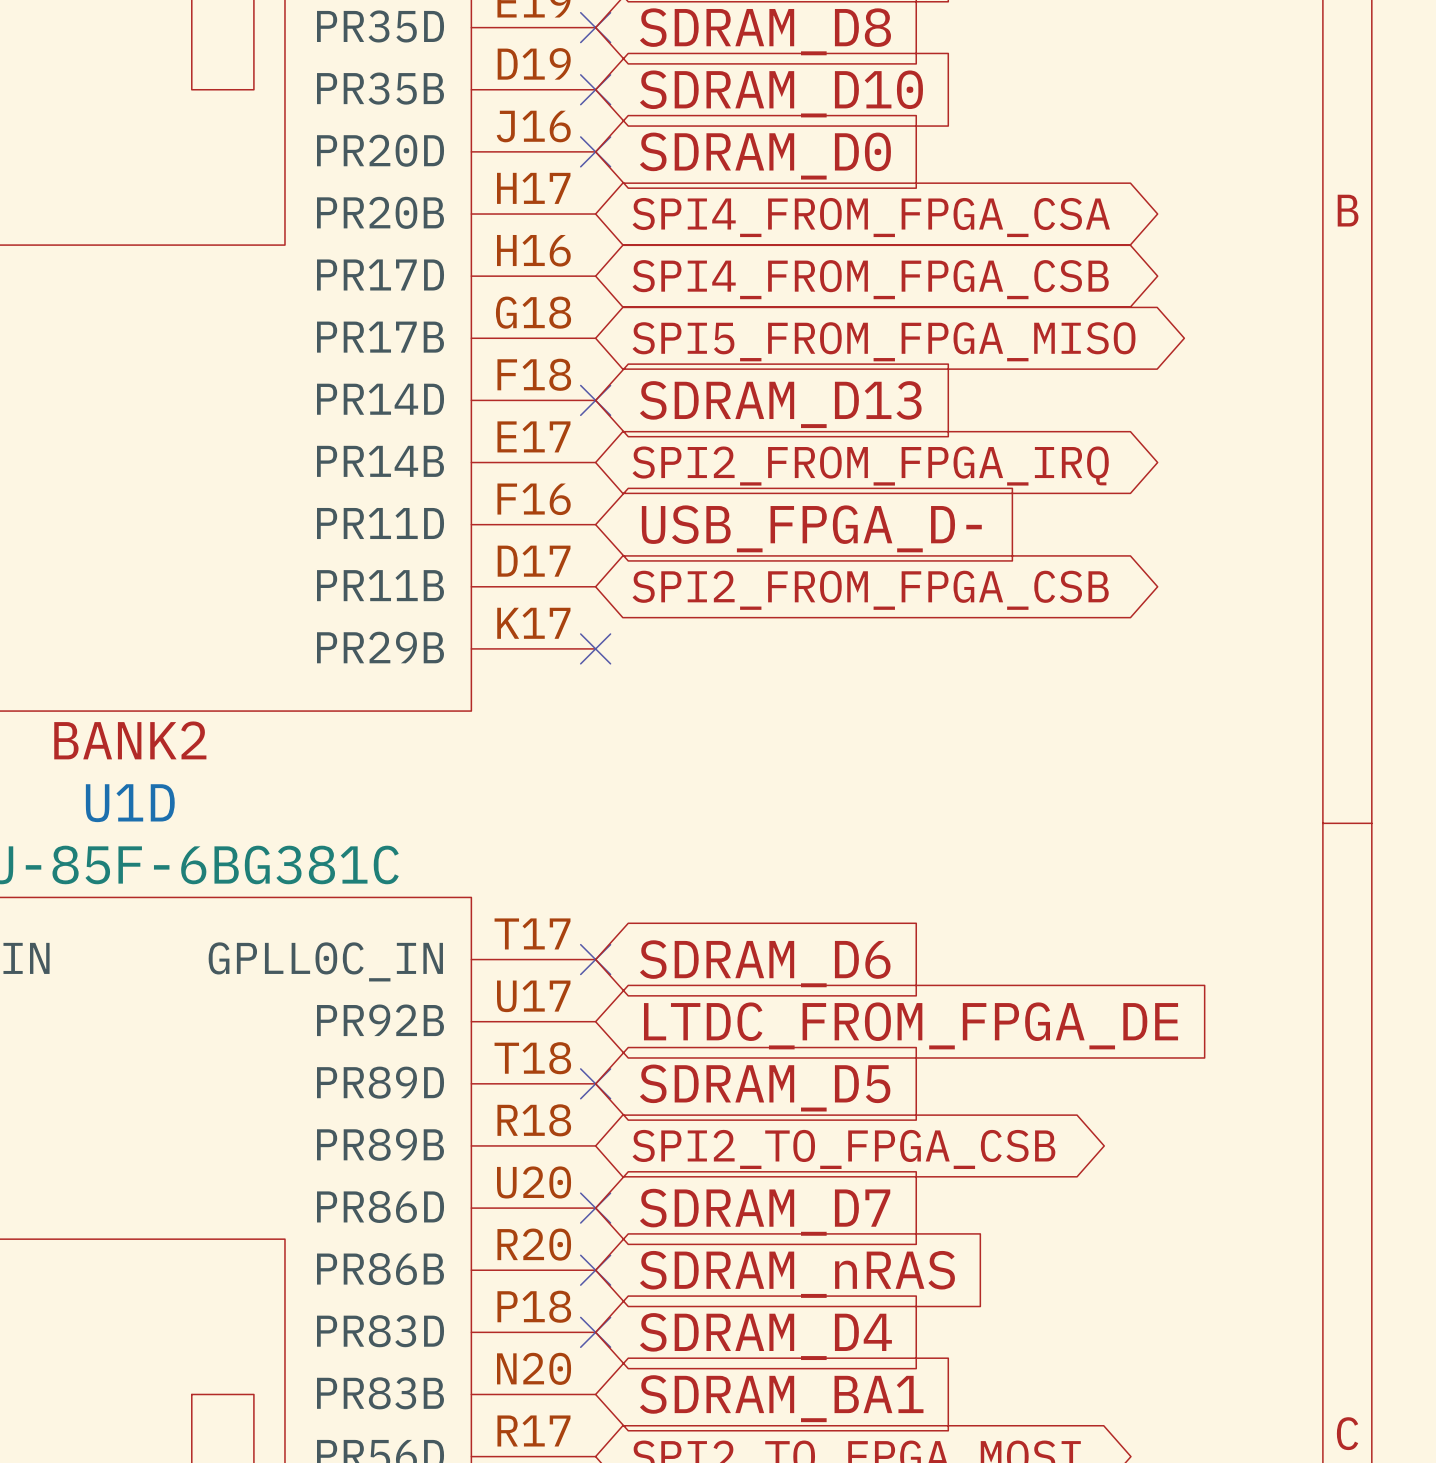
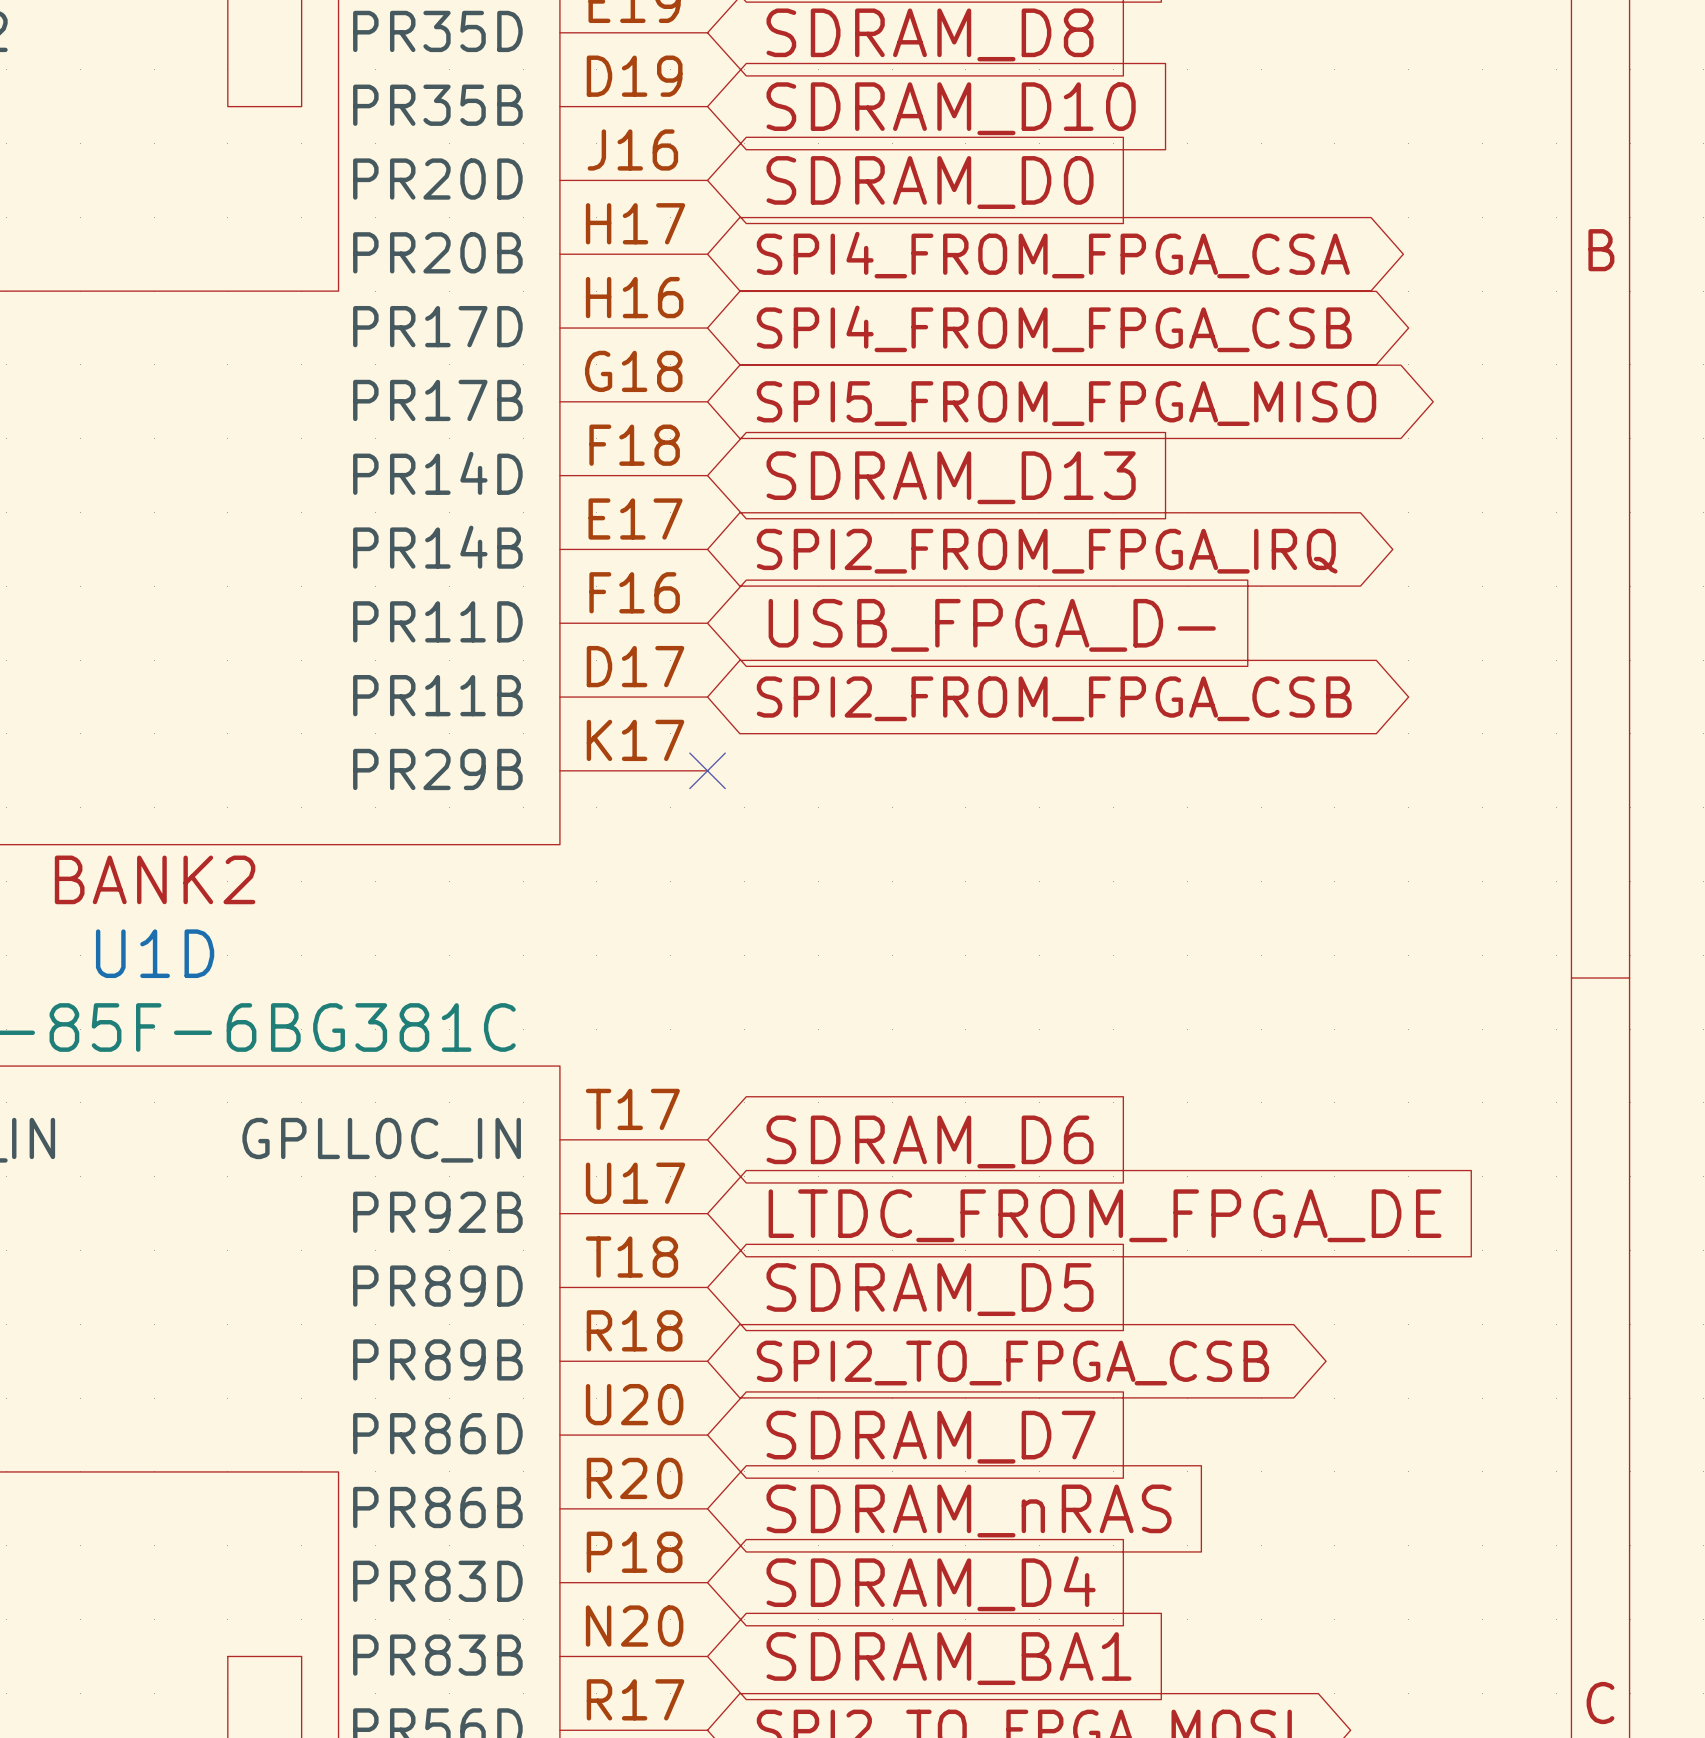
no-connect mark: (595, 27) -> none
no-connect mark: (595, 89) -> none
no-connect mark: (595, 151) -> none
no-connect mark: (595, 400) -> none
no-connect mark: (595, 959) -> none
no-connect mark: (595, 1083) -> none
no-connect mark: (595, 1208) -> none
no-connect mark: (595, 1270) -> none
no-connect mark: (595, 1332) -> none

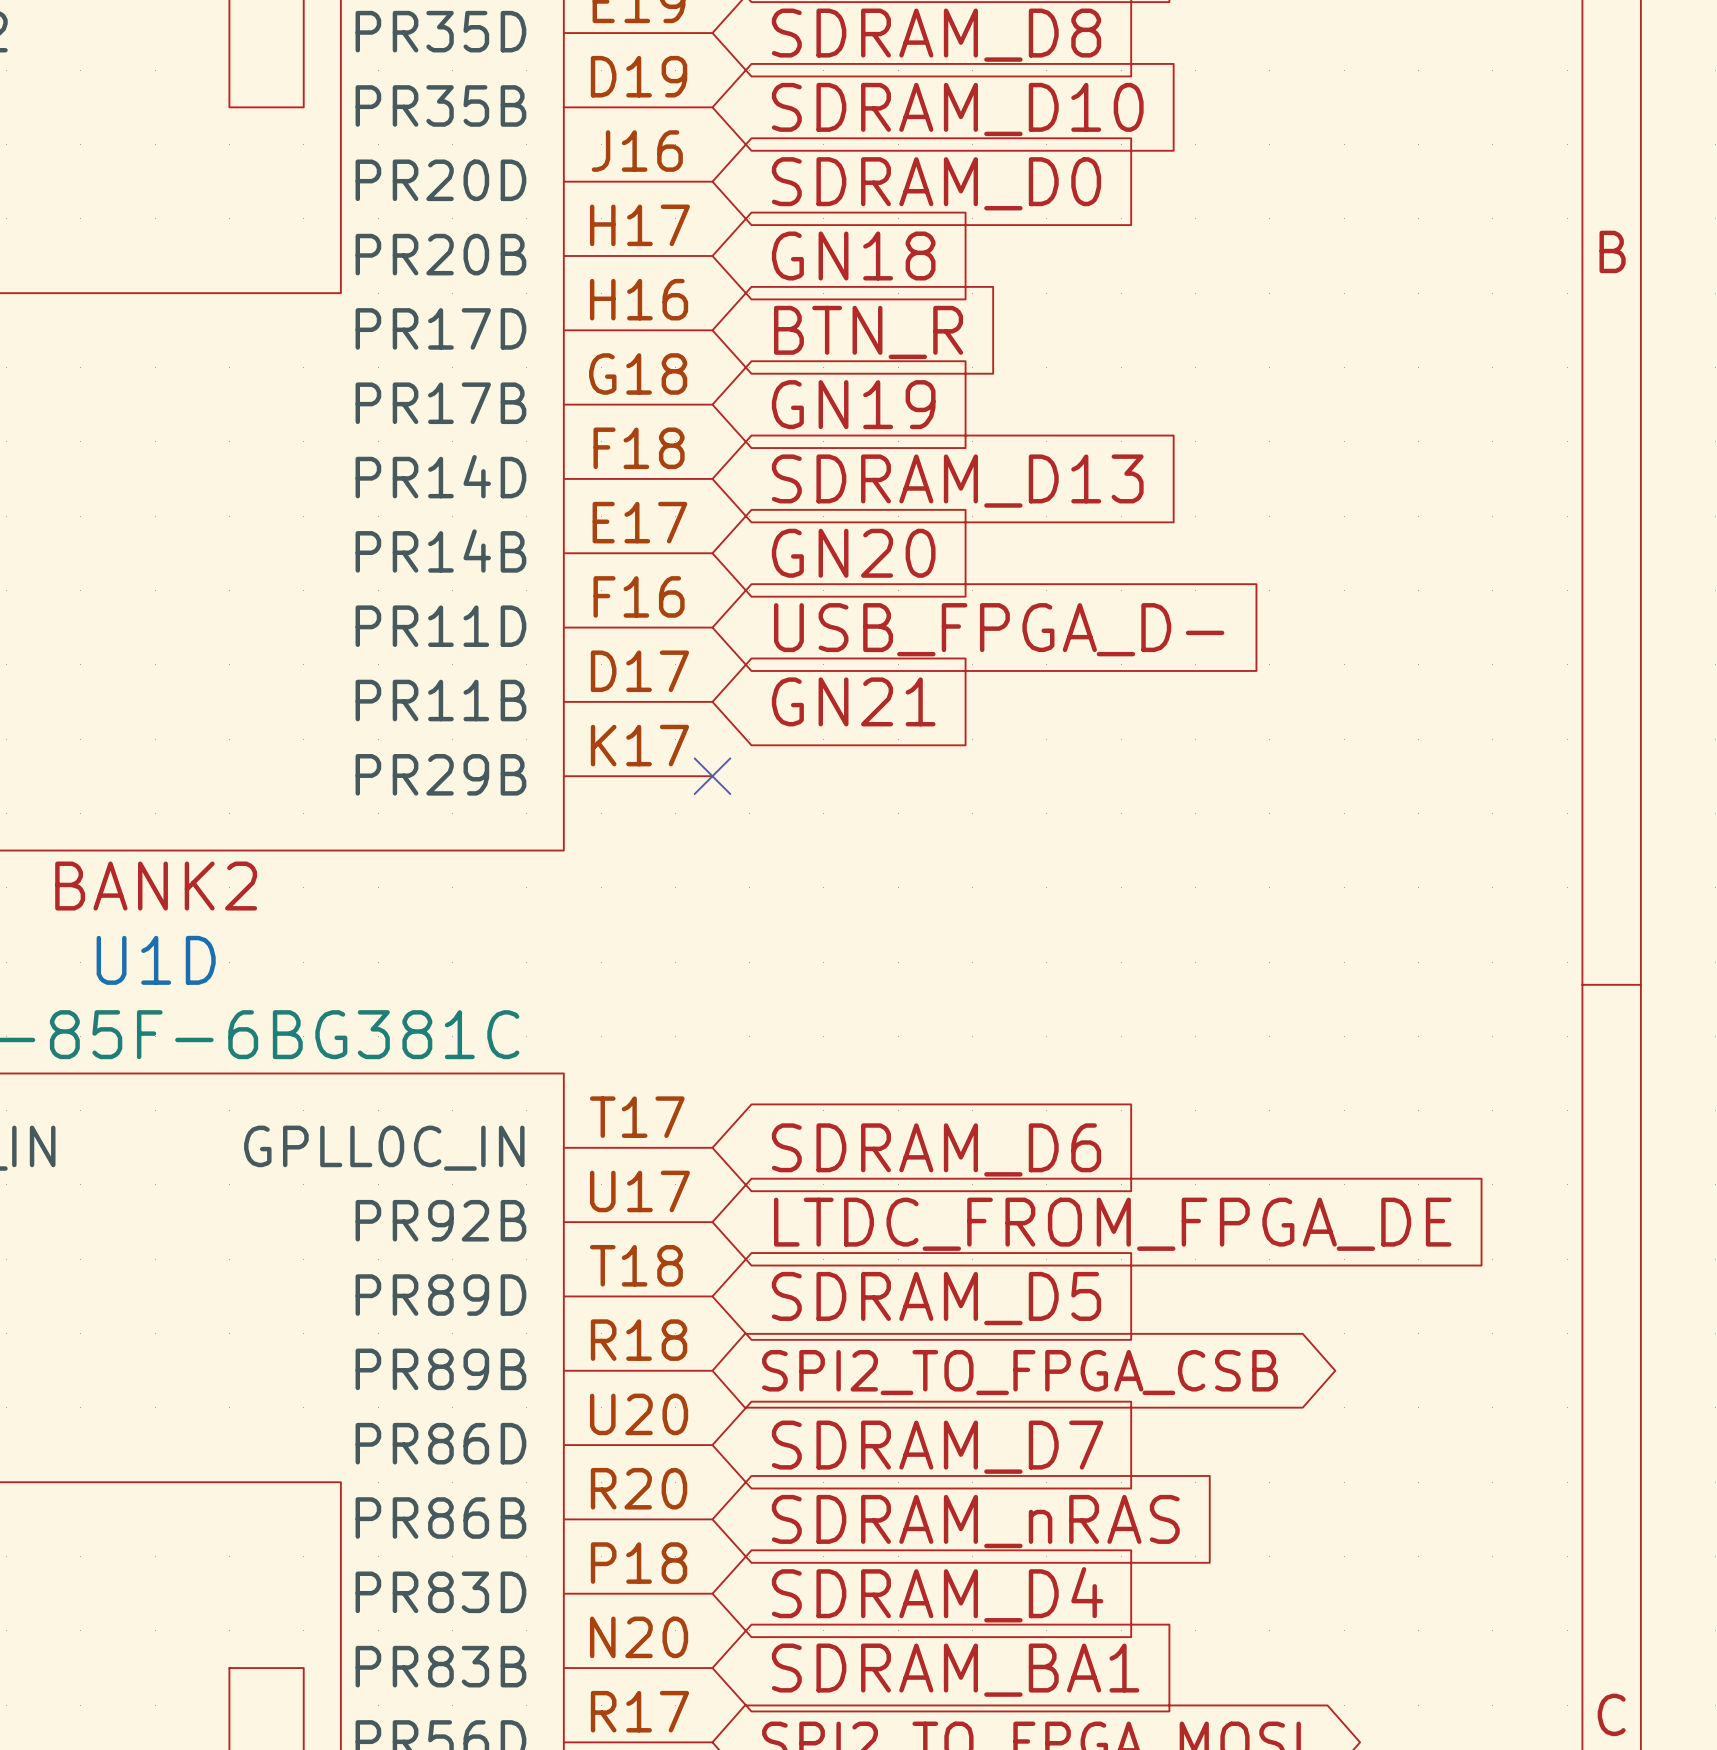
global label shape: bidirectional (1053, 255) -> input (853, 255)
global label: SPI4_FROM_FPGA_CSA (1053, 255) -> GN18 (853, 255)
global label shape: bidirectional (1054, 328) -> input (868, 332)
global label: SPI4_FROM_FPGA_CSB (1054, 328) -> BTN_R (868, 332)
global label shape: bidirectional (1066, 403) -> input (853, 404)
global label: SPI5_FROM_FPGA_MISO (1066, 403) -> GN19 (853, 404)
global label shape: bidirectional (1047, 551) -> input (853, 553)
global label: SPI2_FROM_FPGA_IRQ (1047, 551) -> GN20 (853, 553)
global label shape: bidirectional (1054, 698) -> input (853, 701)
global label: SPI2_FROM_FPGA_CSB (1054, 698) -> GN21 (853, 701)

